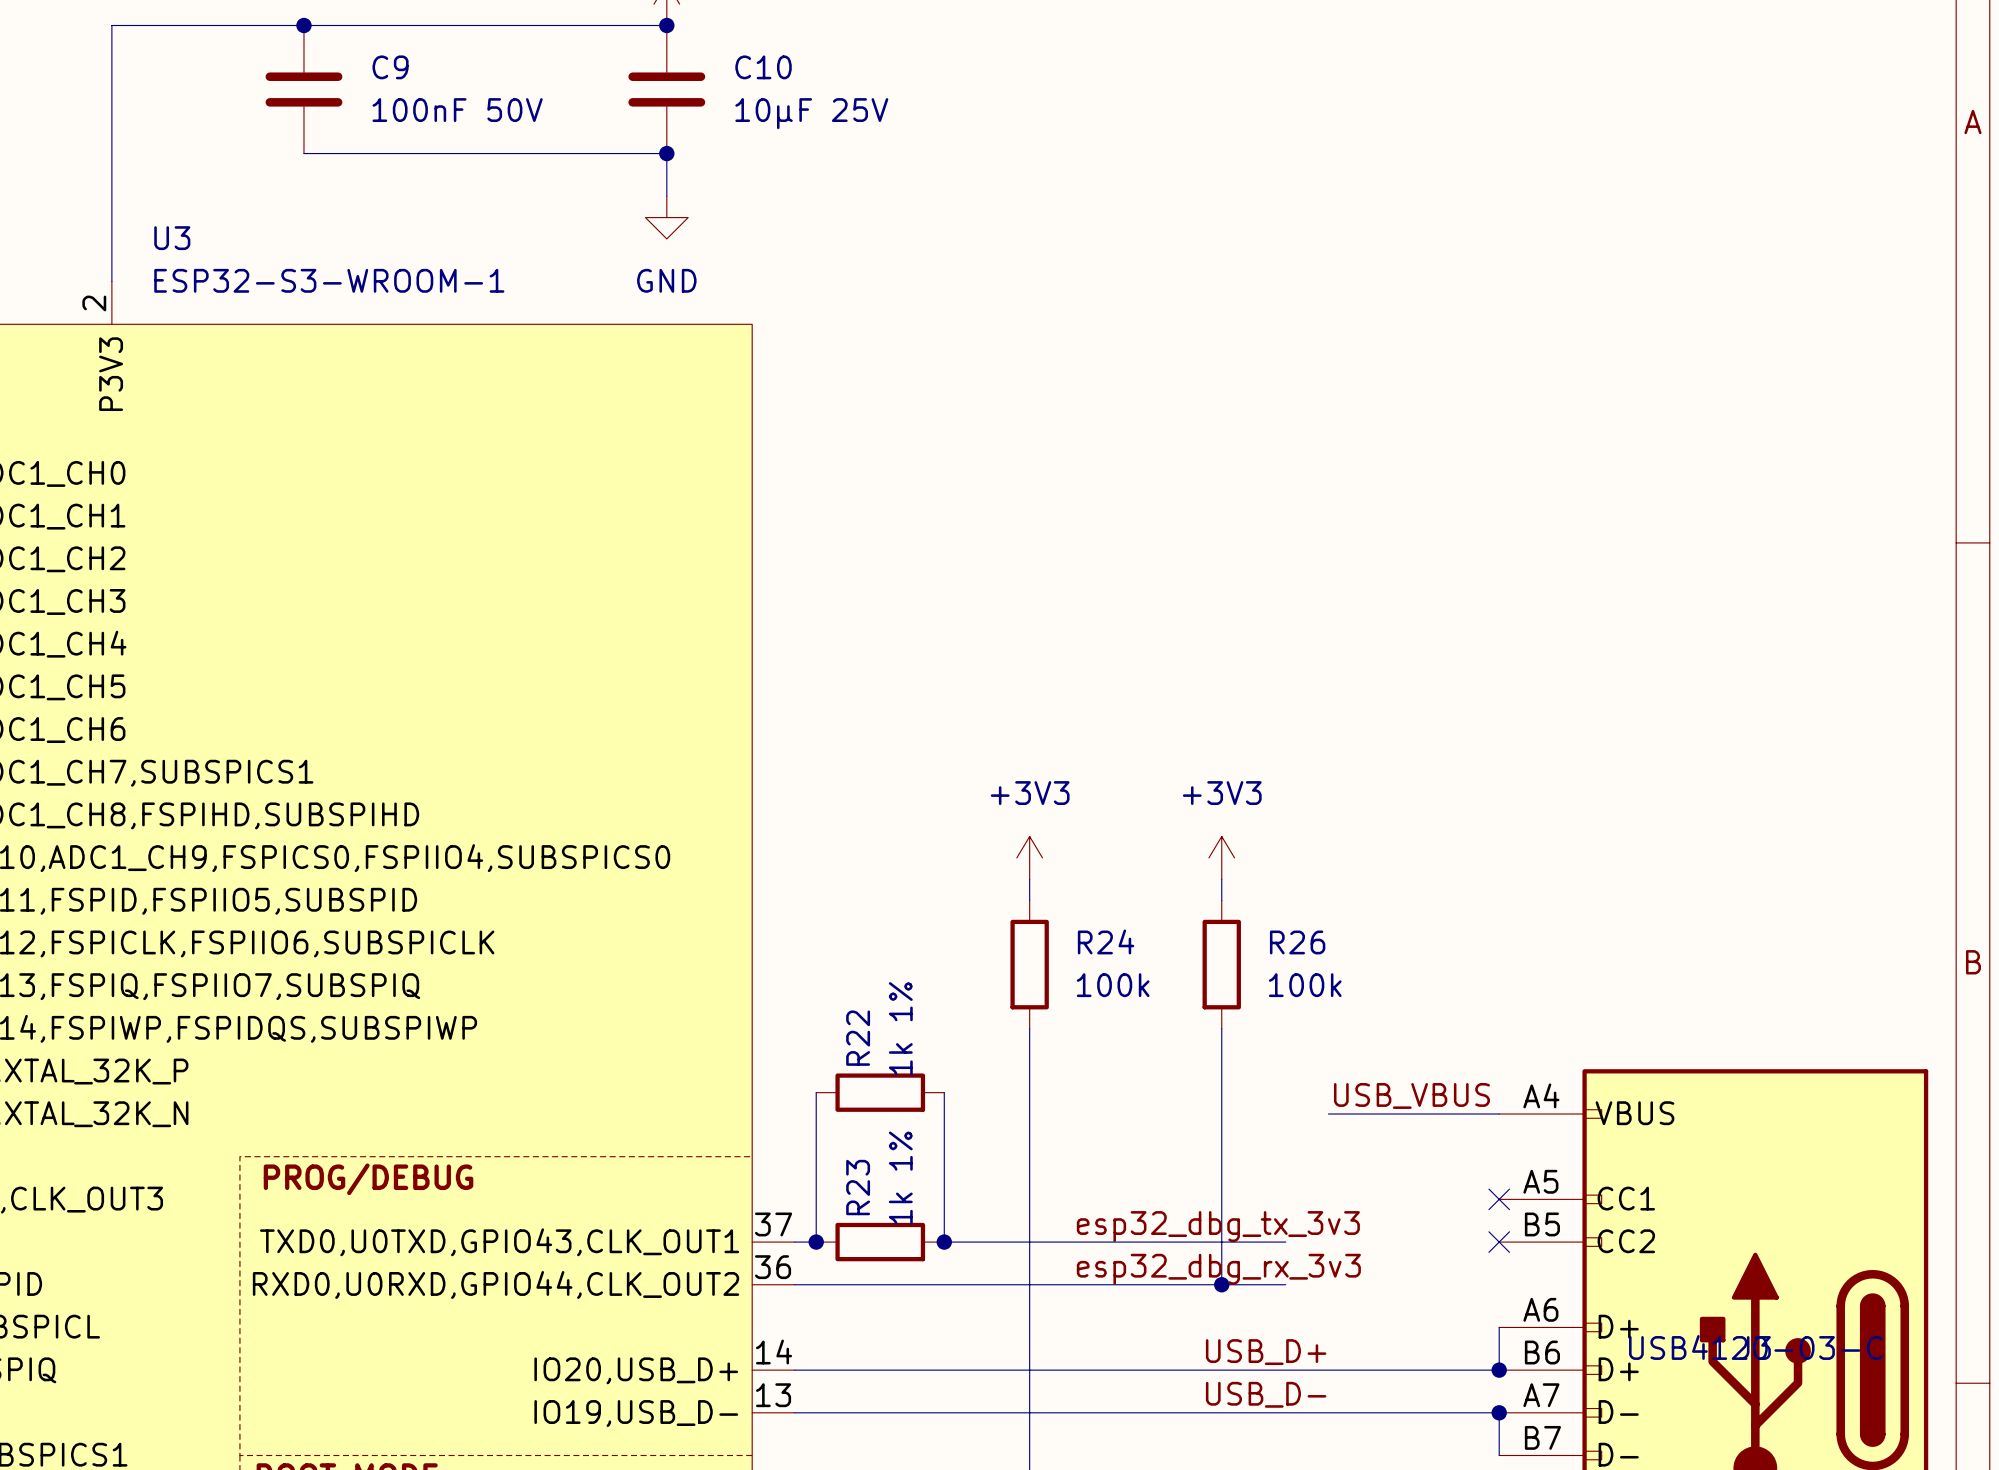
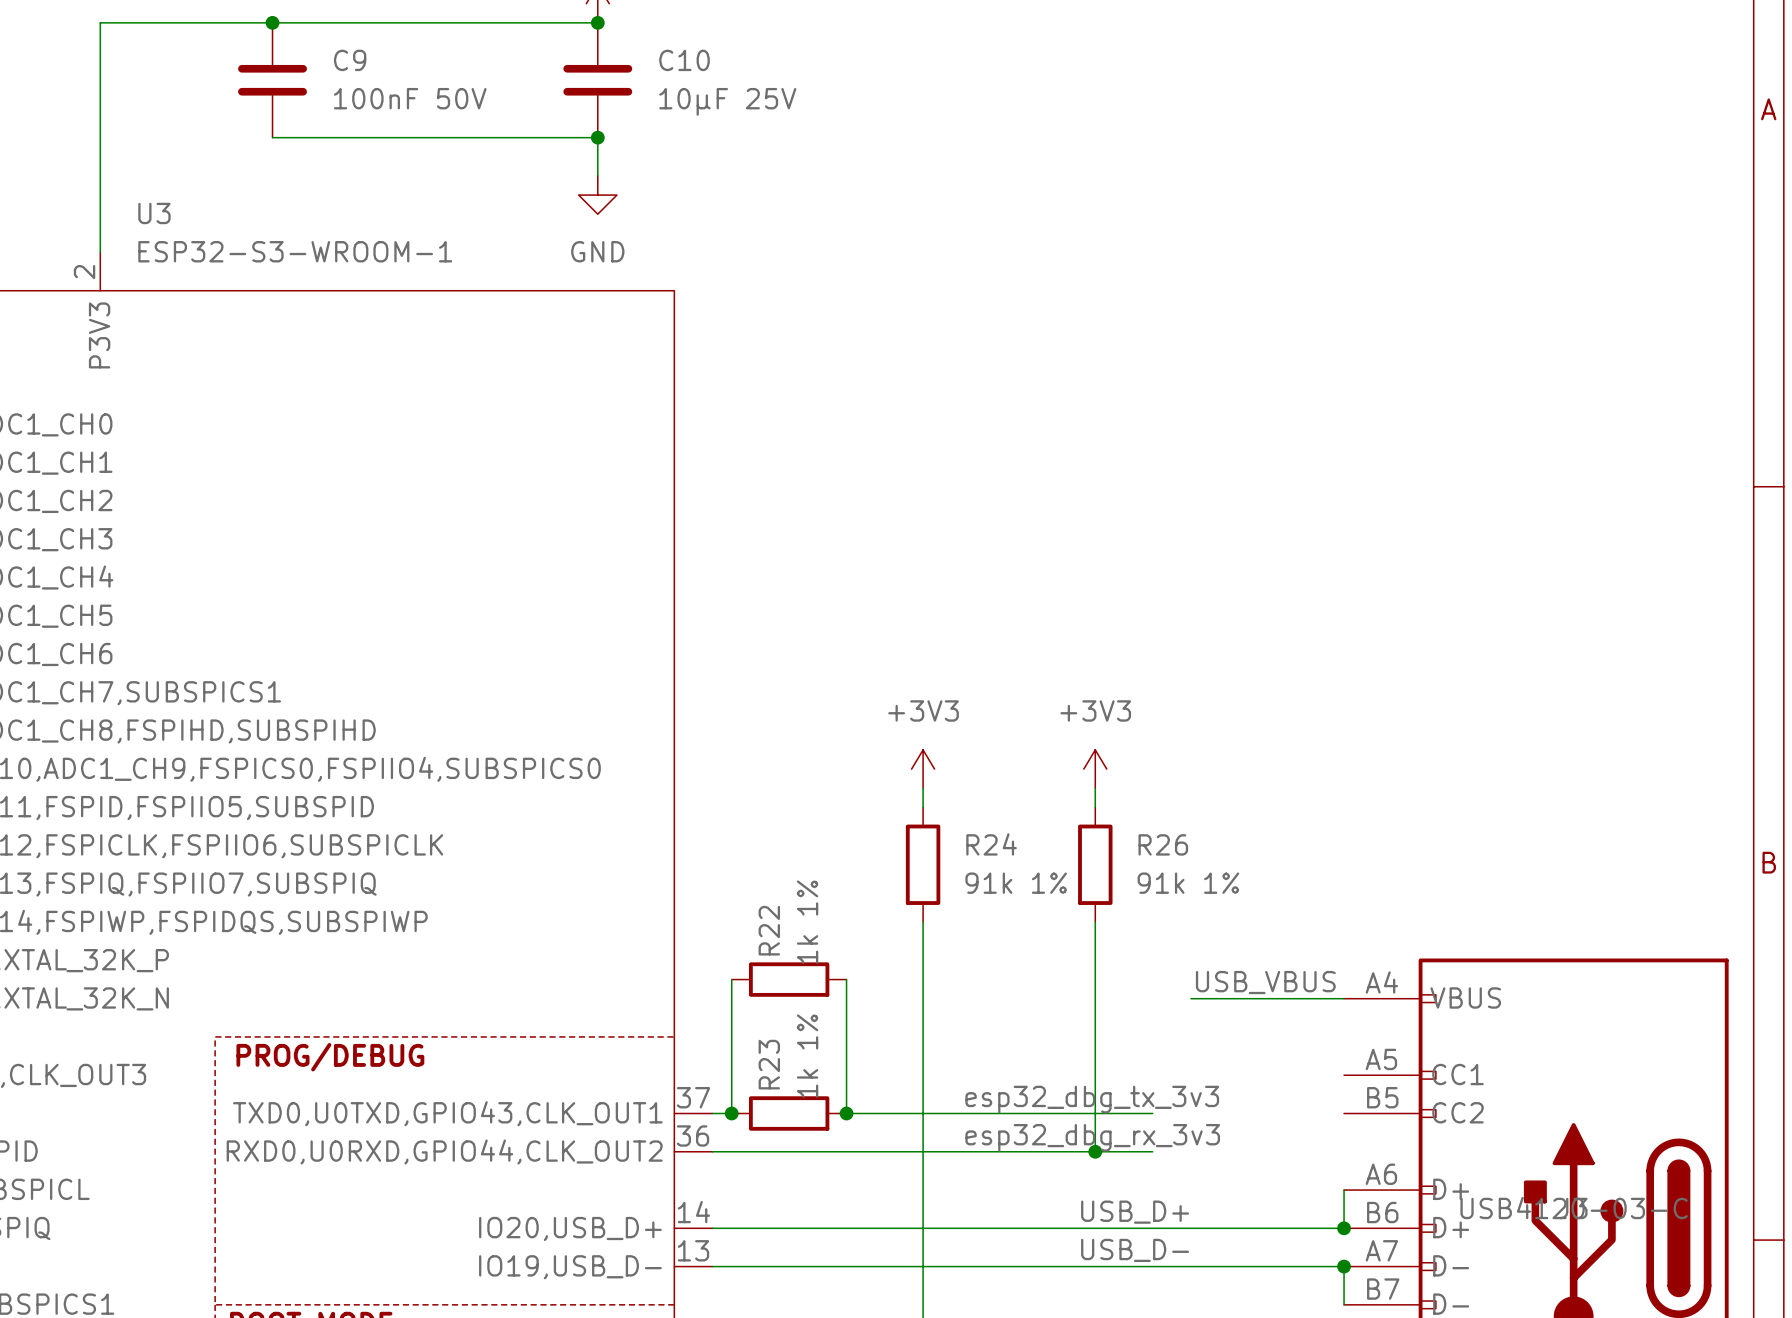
R24 value: 100k (1113, 985) -> 91k 1% (1016, 883)
R26 value: 100k (1305, 985) -> 91k 1% (1188, 883)
no-connect mark: (1499, 1199) -> none
no-connect mark: (1499, 1242) -> none

